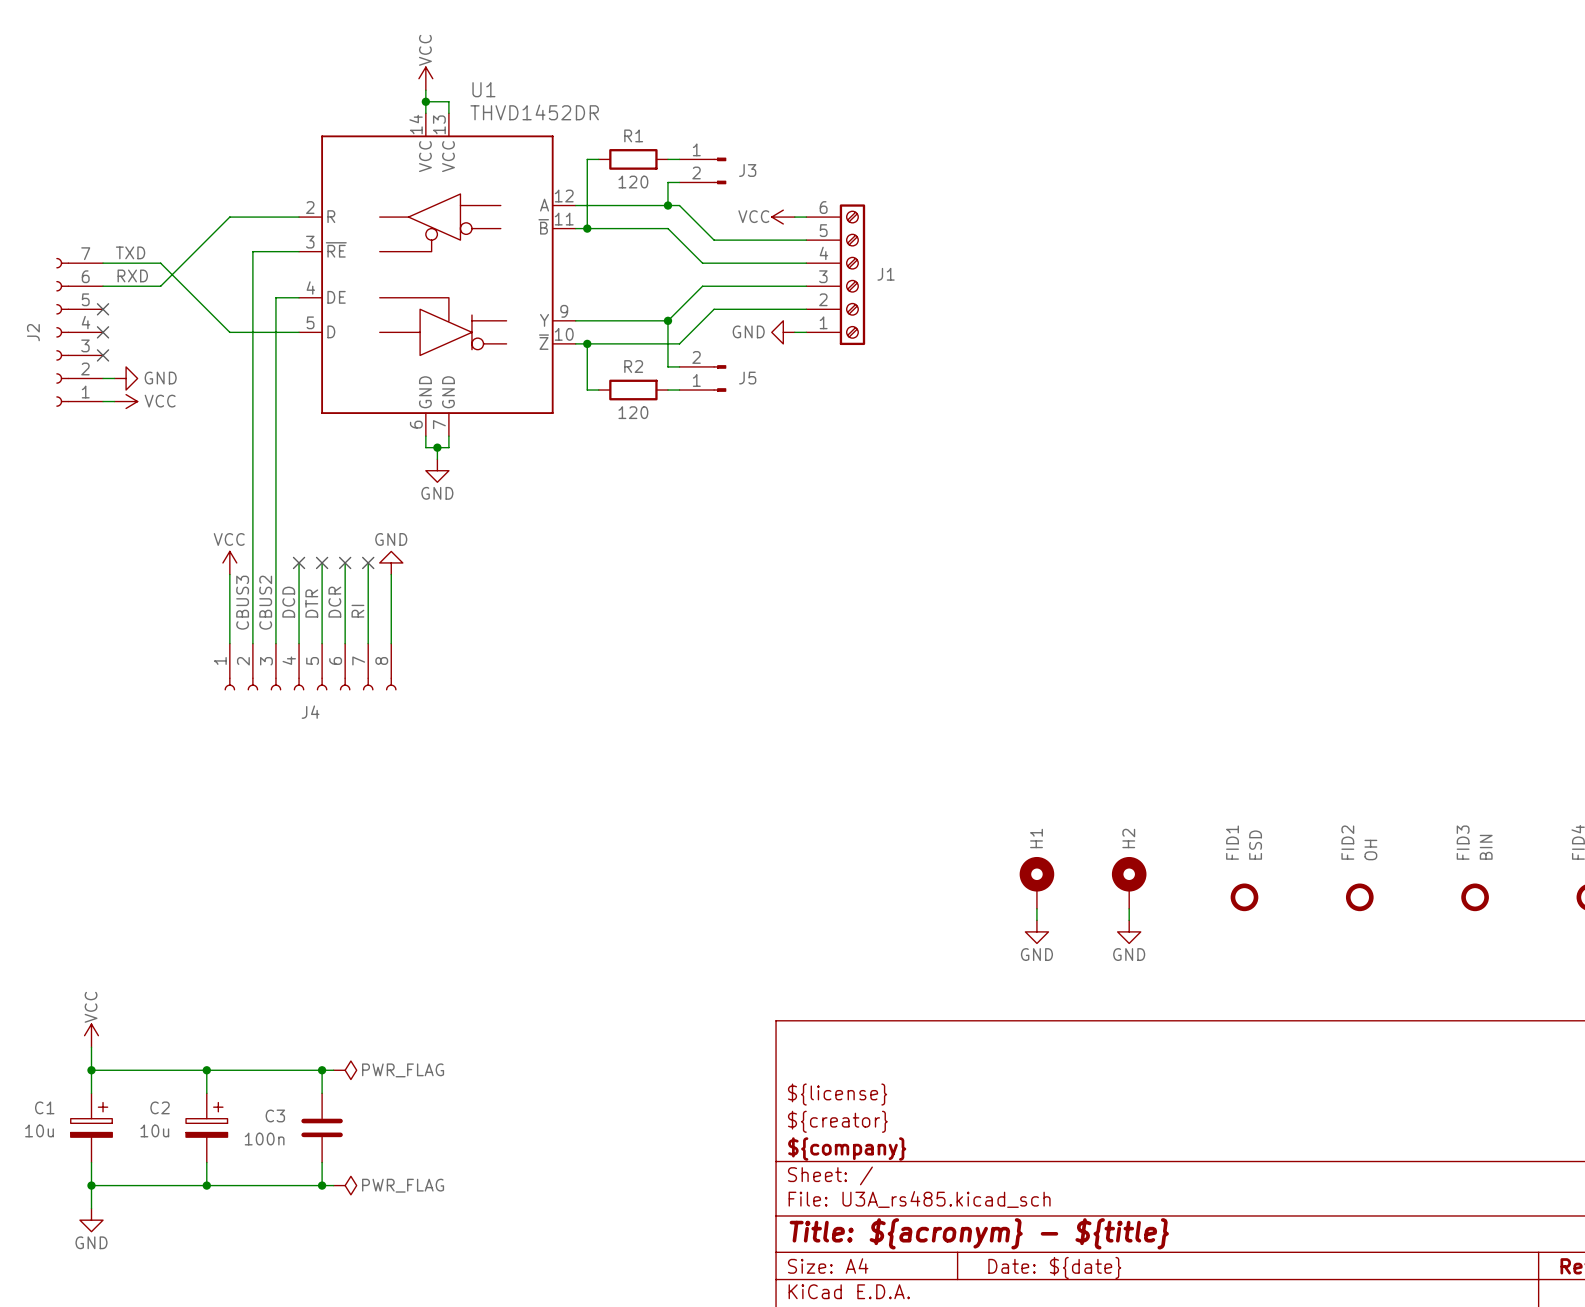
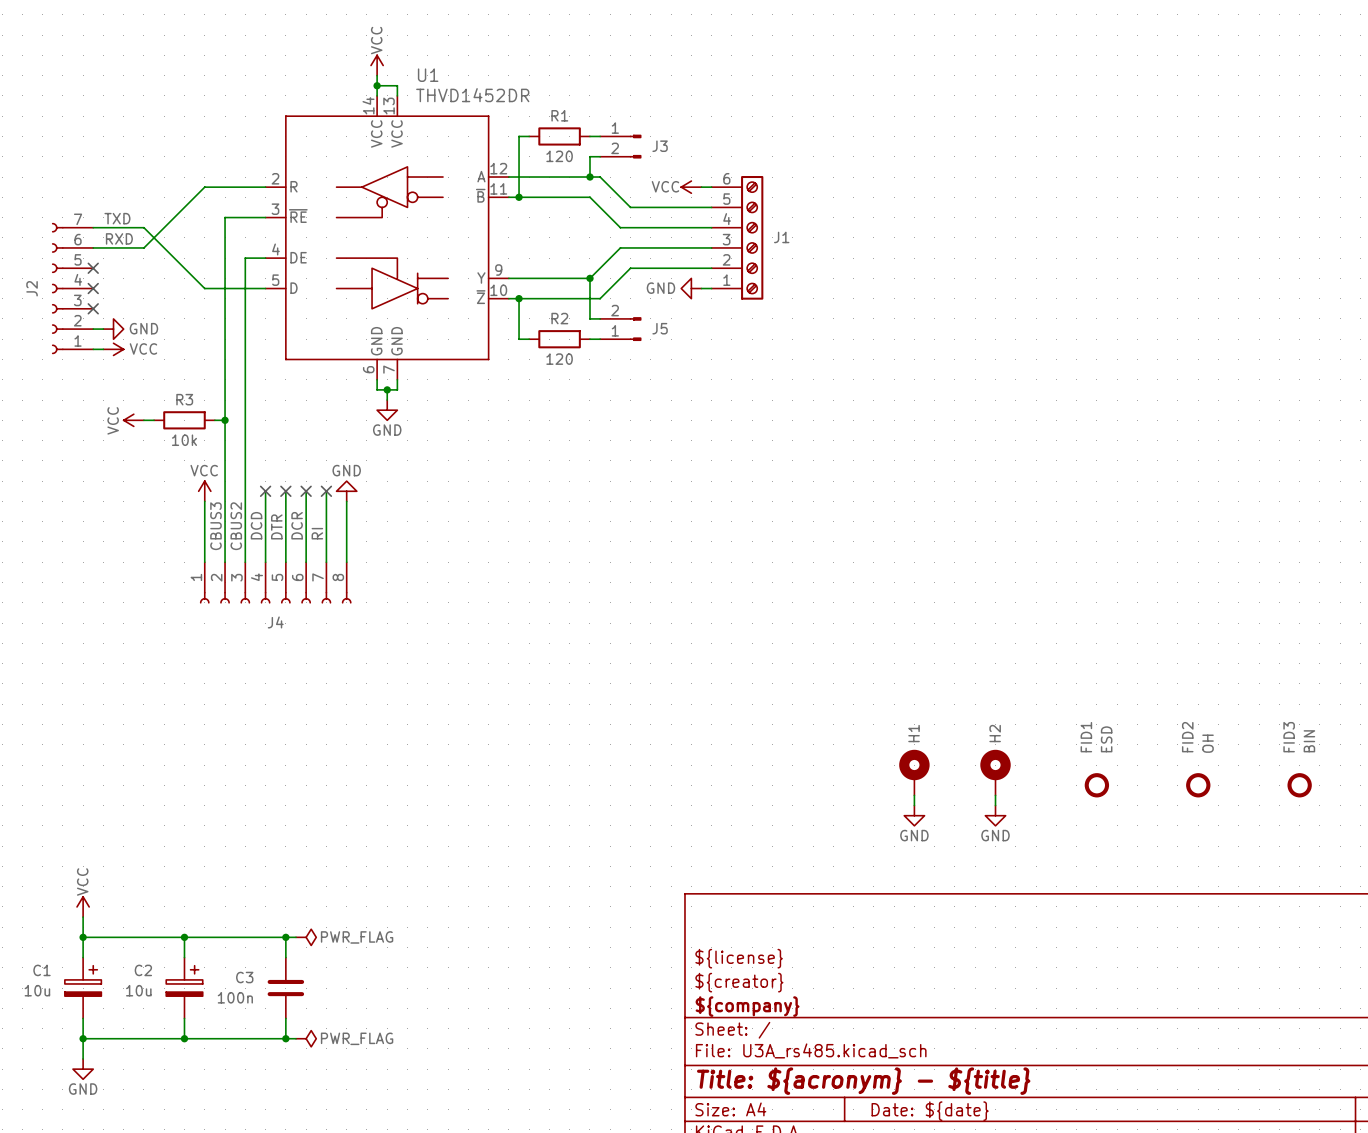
power symbol: none -> VCC (133, 420)
wire: none -> (143, 420) (154, 420)
R3: none -> 10k (184, 420)
wire: none -> (214, 420) (225, 420)
junction: none -> (225, 420)

